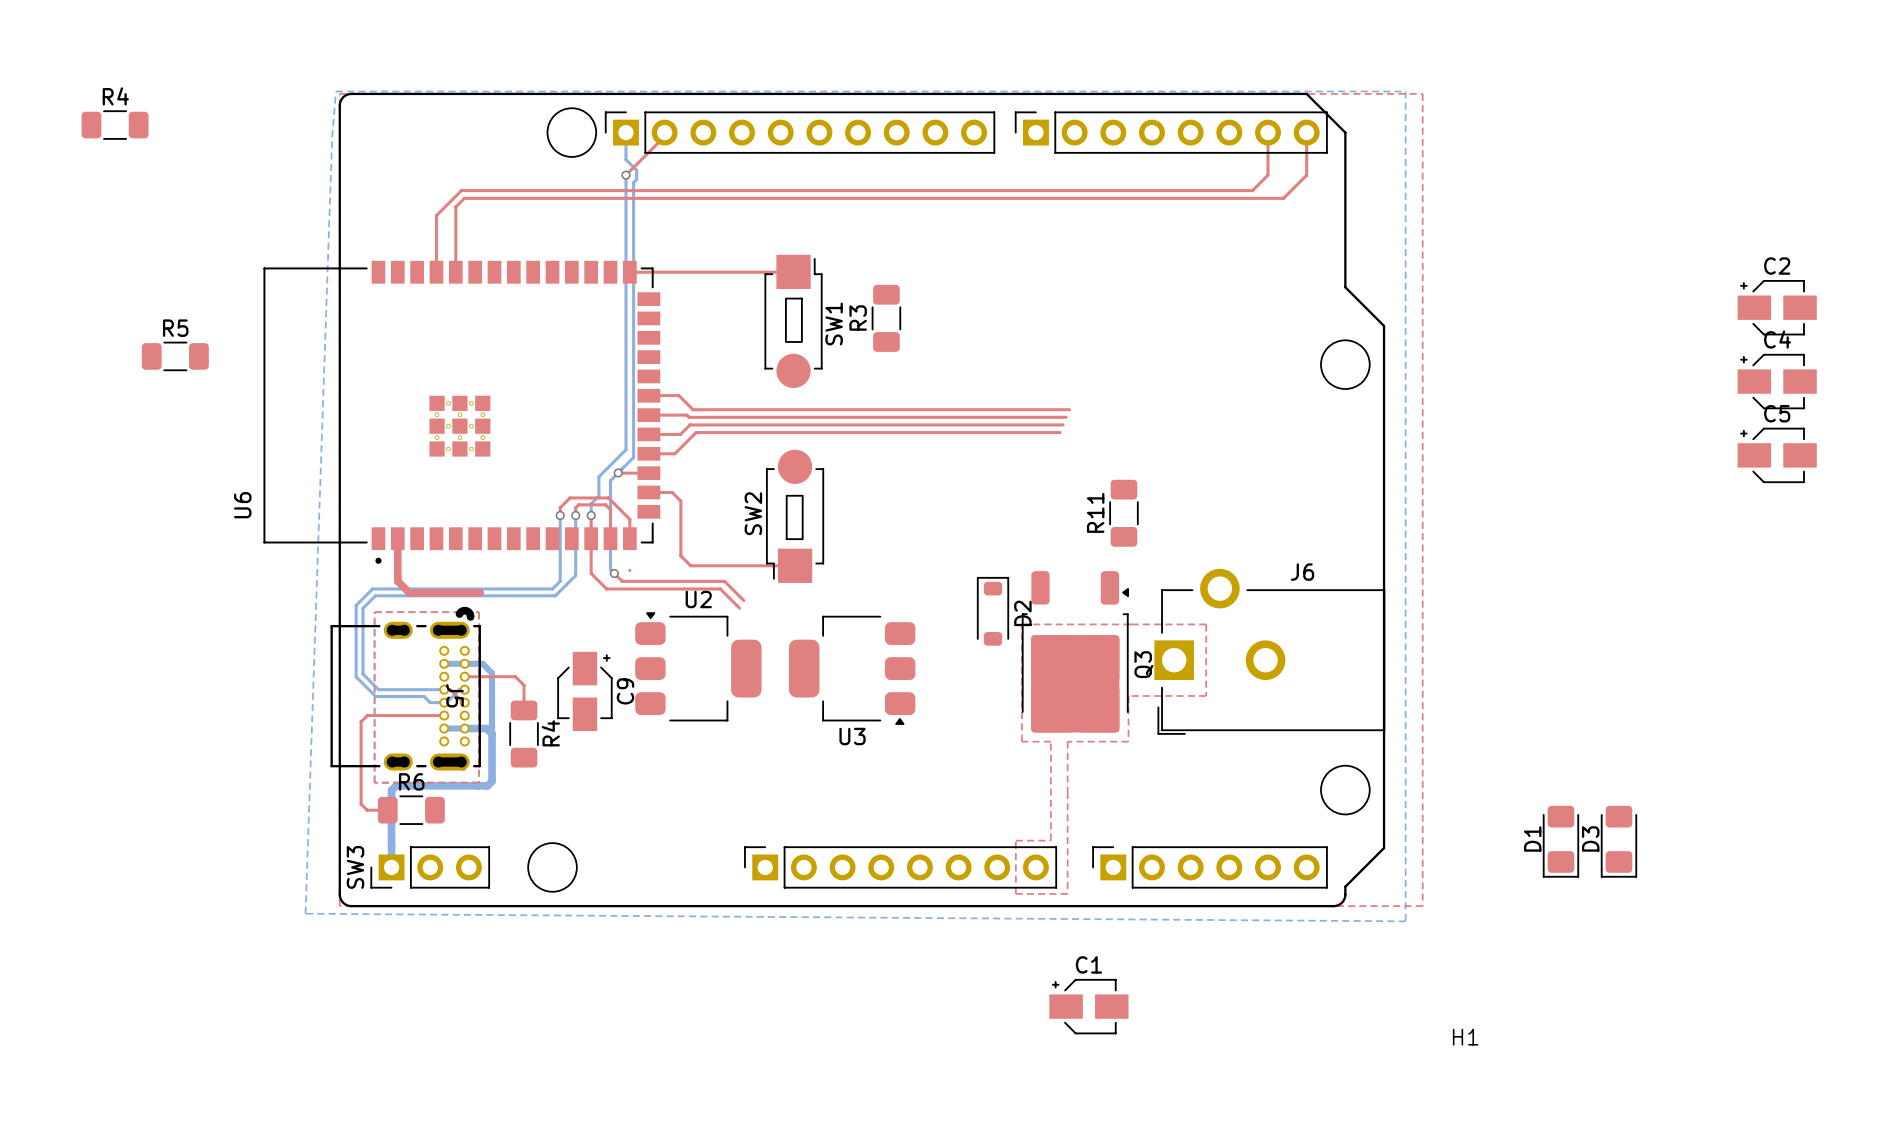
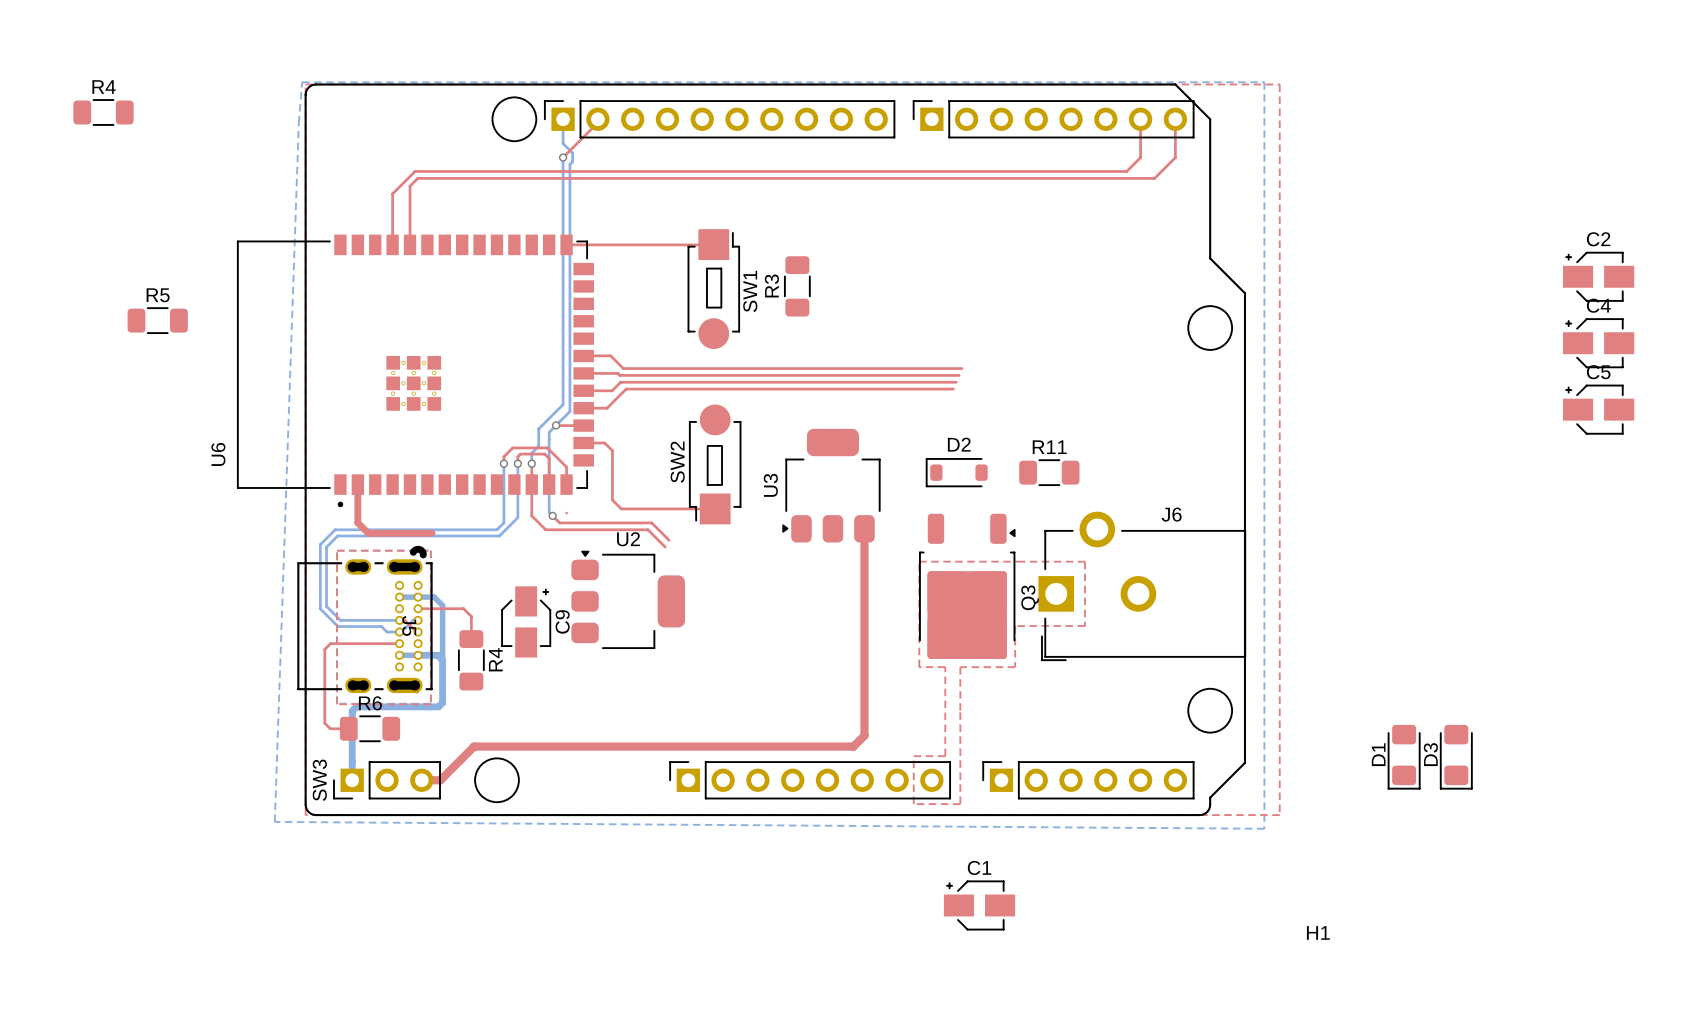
R11 rotation: 0° (1123, 513) -> 90° clockwise (1049, 472)
R11 position: (1123, 513) -> (1049, 472)
top track: none -> (864, 528) (864, 735) (853, 746) (474, 746) (440, 780) (421, 780)
D2 rotation: 0° (993, 611) -> 90° counterclockwise (956, 472)
D2 position: (993, 611) -> (956, 472)
U3 rotation: 0° (852, 670) -> 90° clockwise (831, 485)
U3 position: (852, 670) -> (831, 485)

